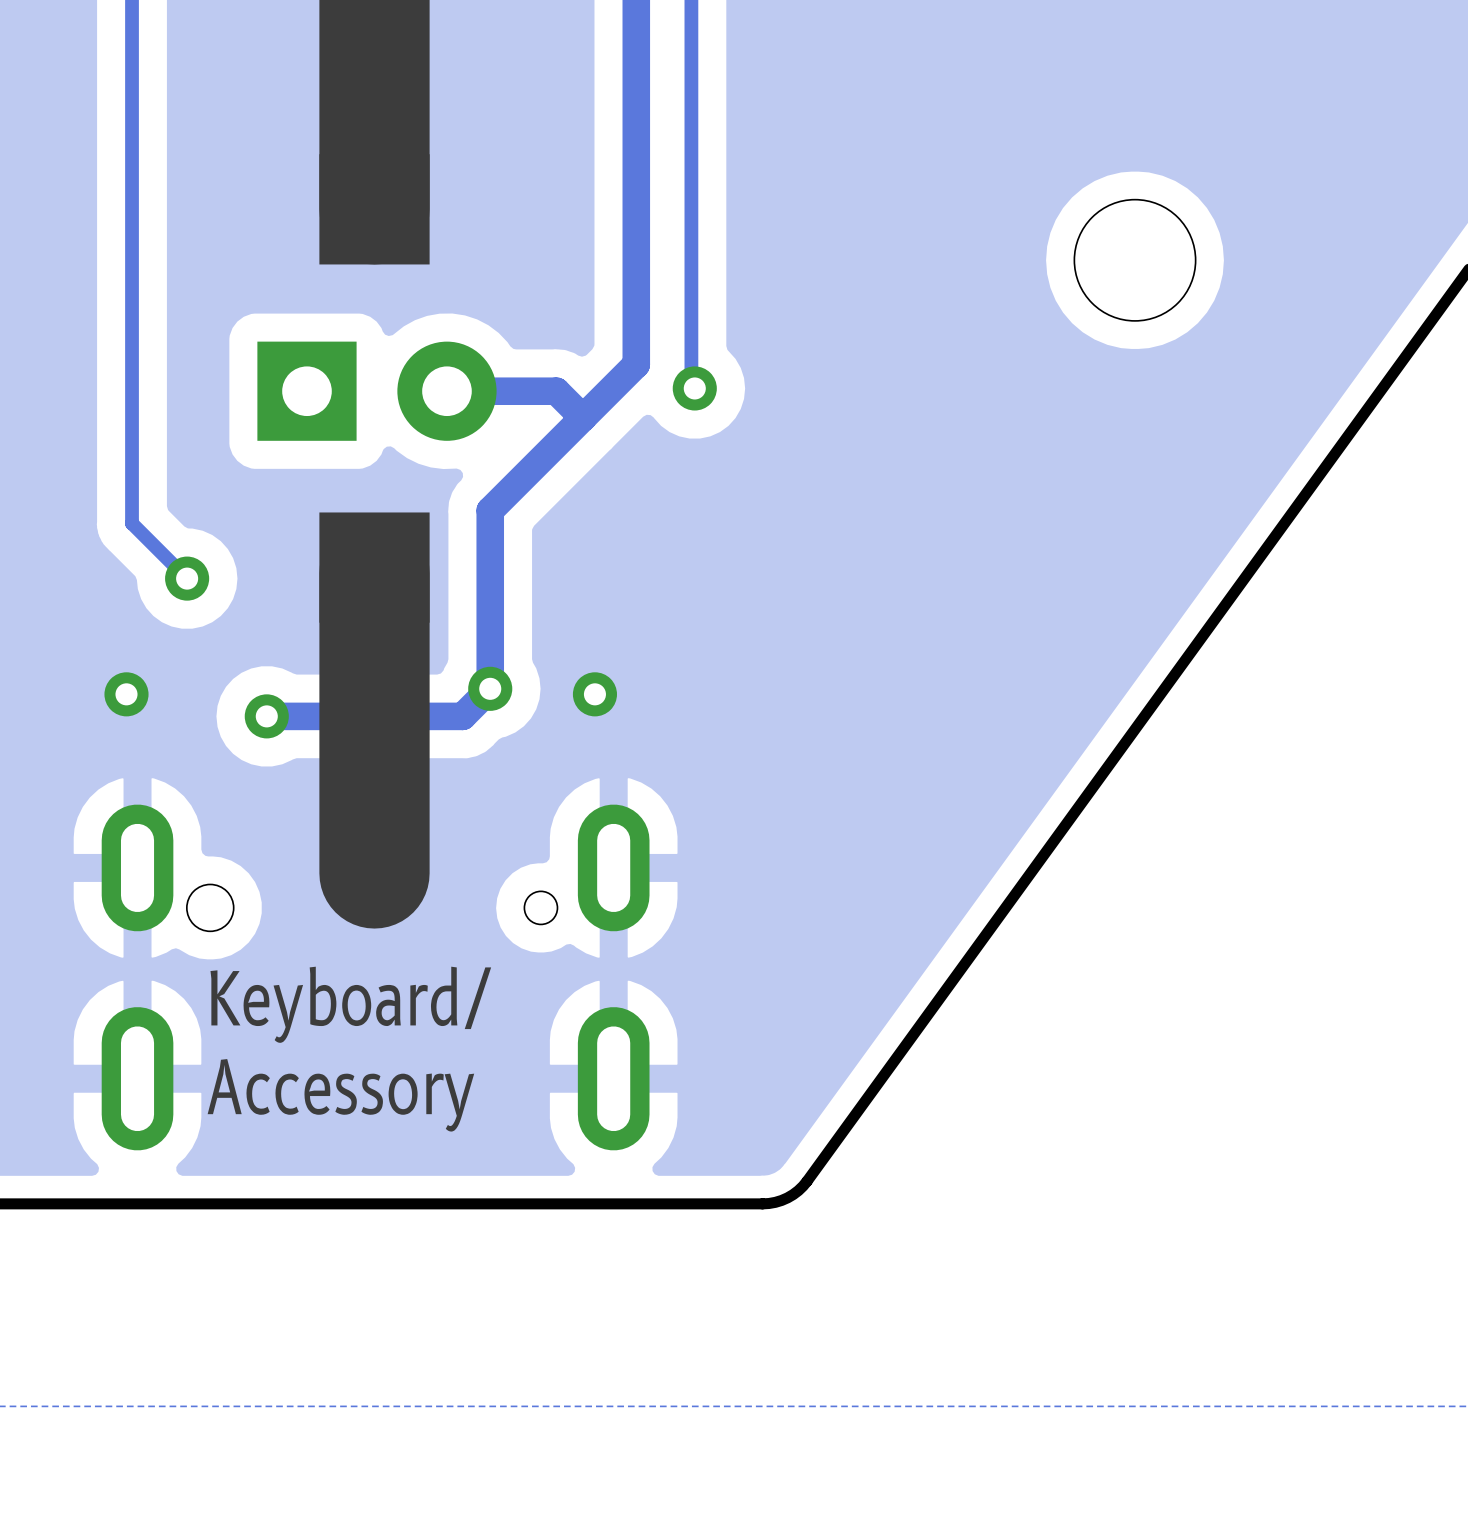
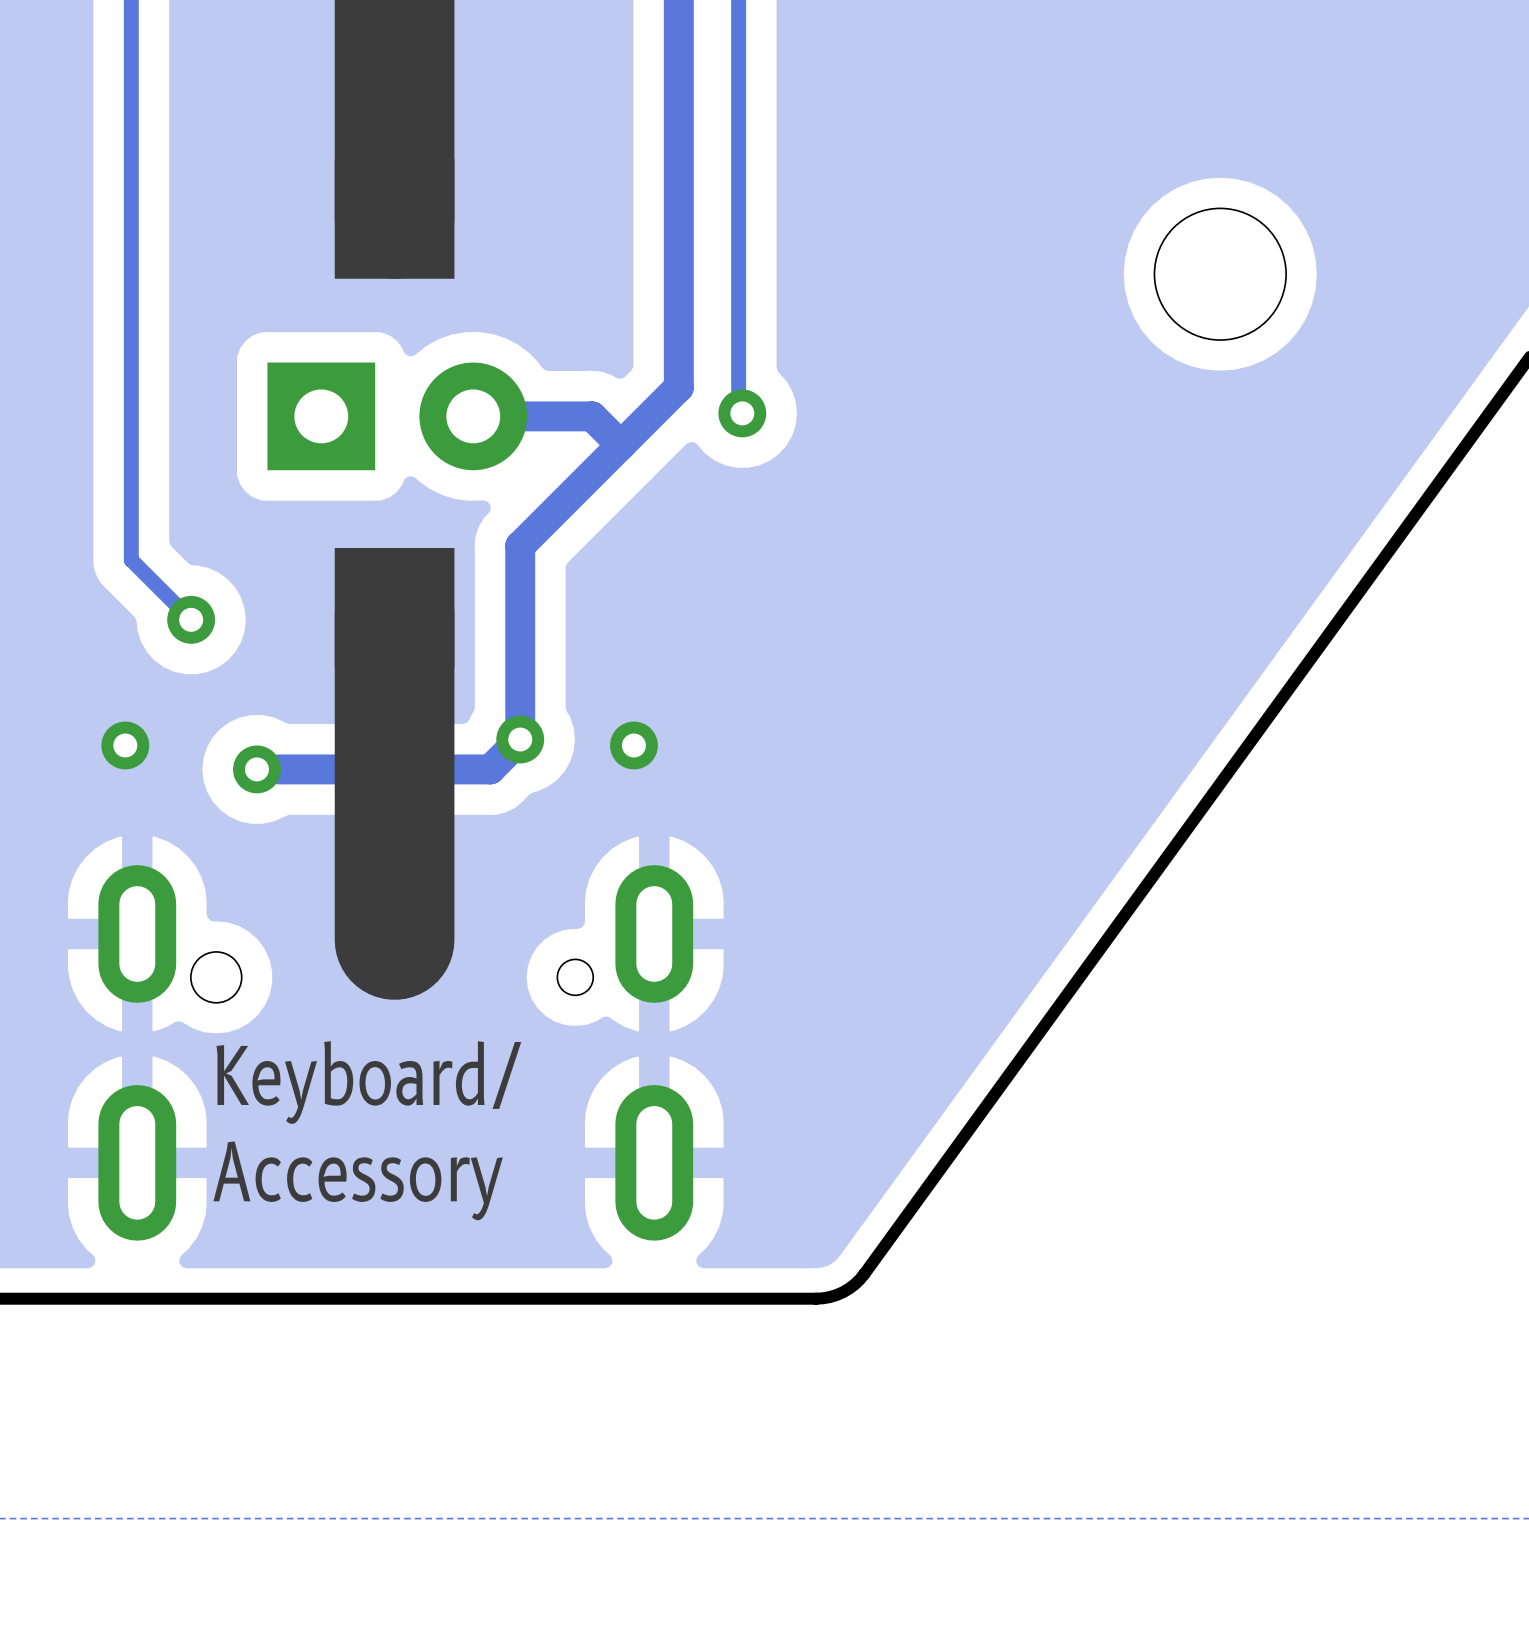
via position: (266, 716) -> (256, 769)

